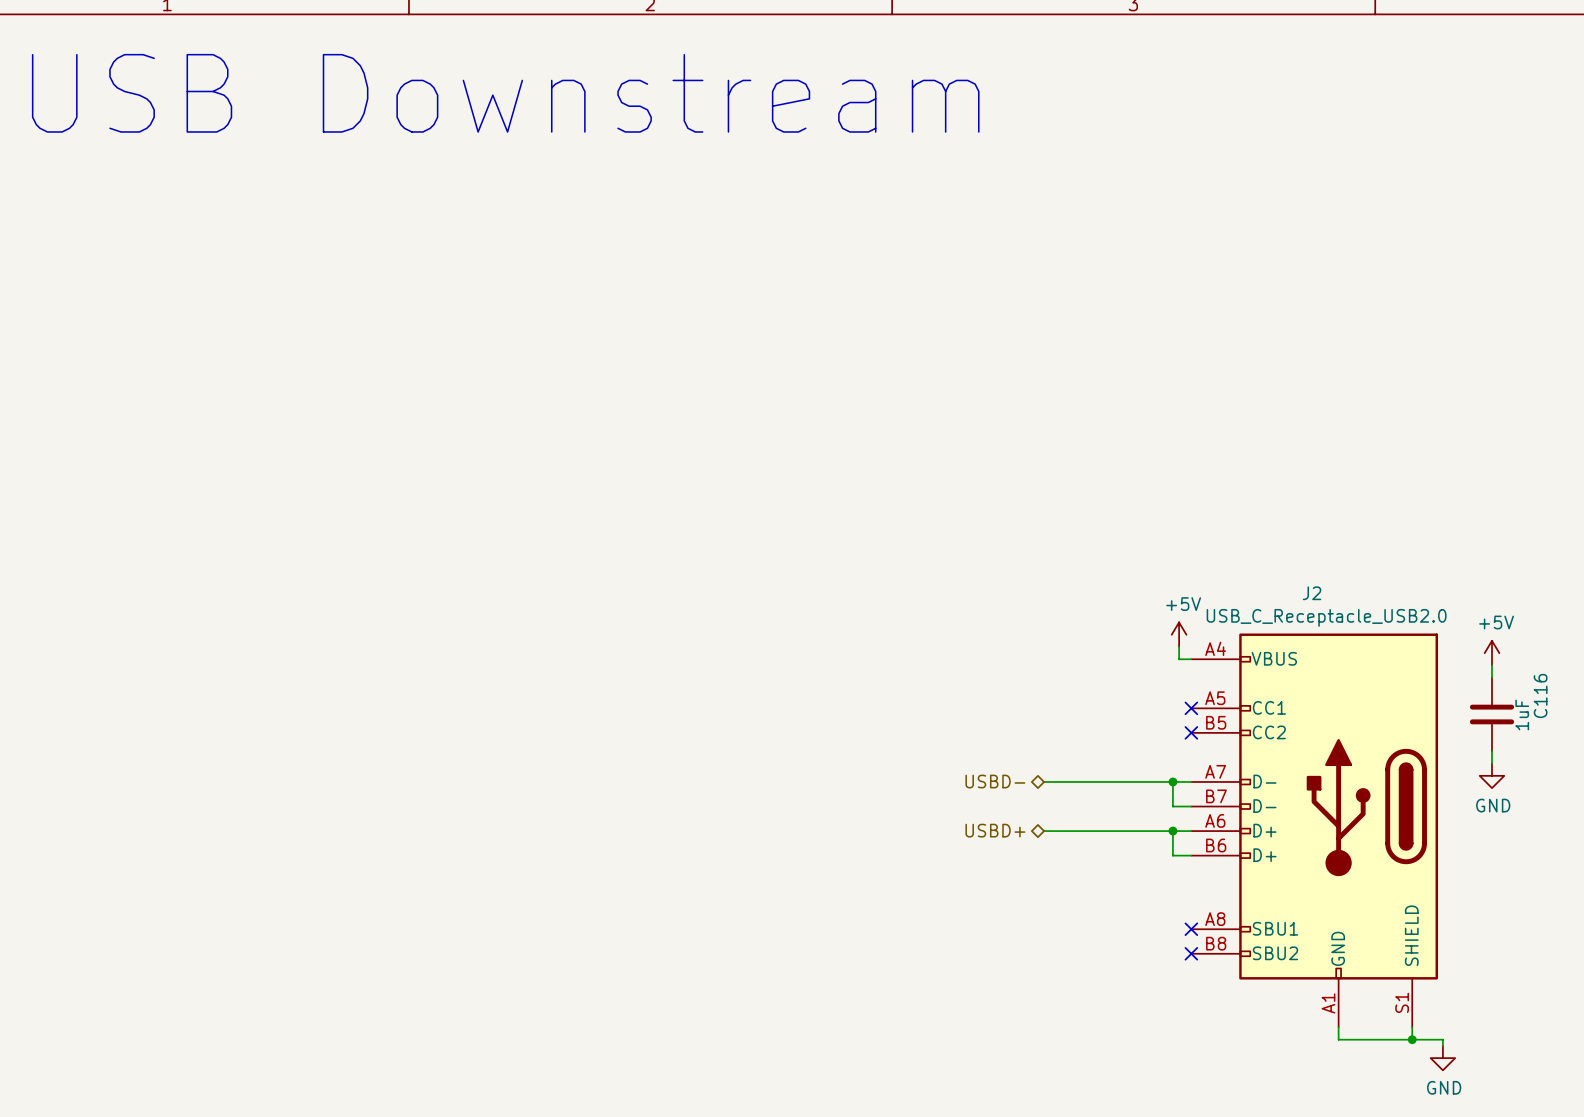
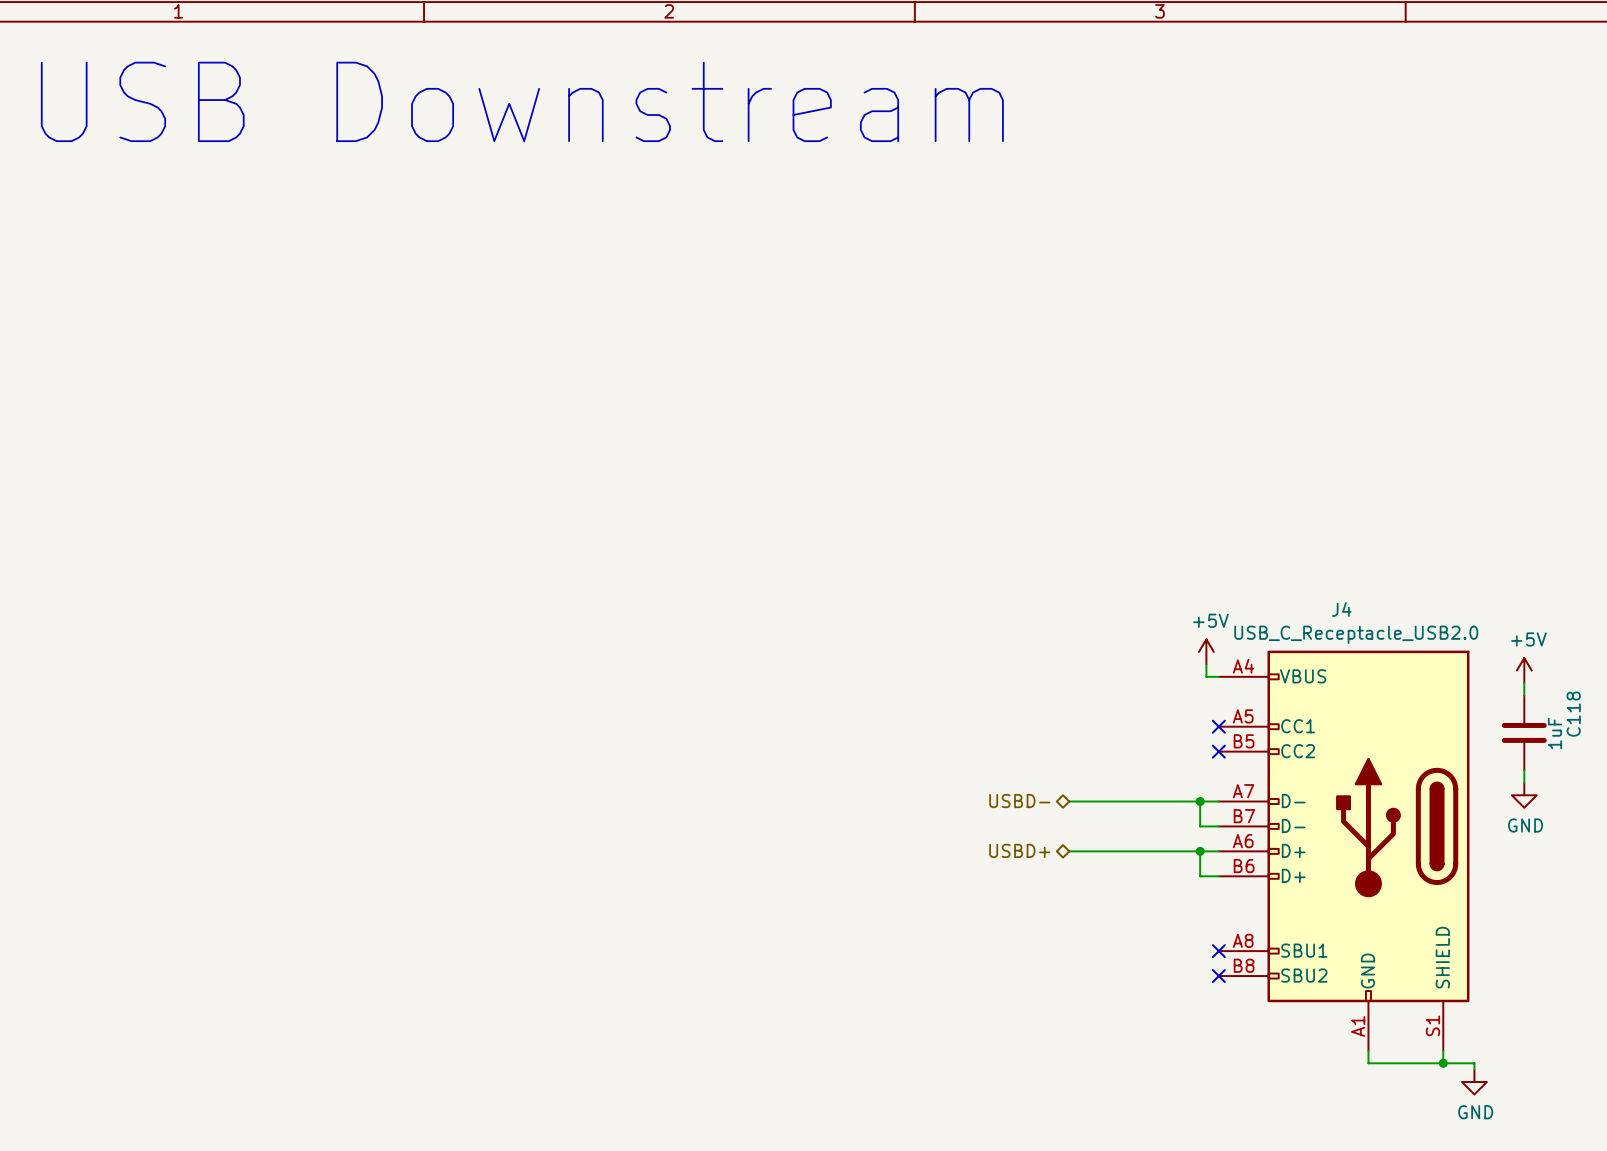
J2 name: J2 (1312, 593) -> J4 (1341, 609)
C116 name: C116 (1540, 695) -> C118 (1573, 714)

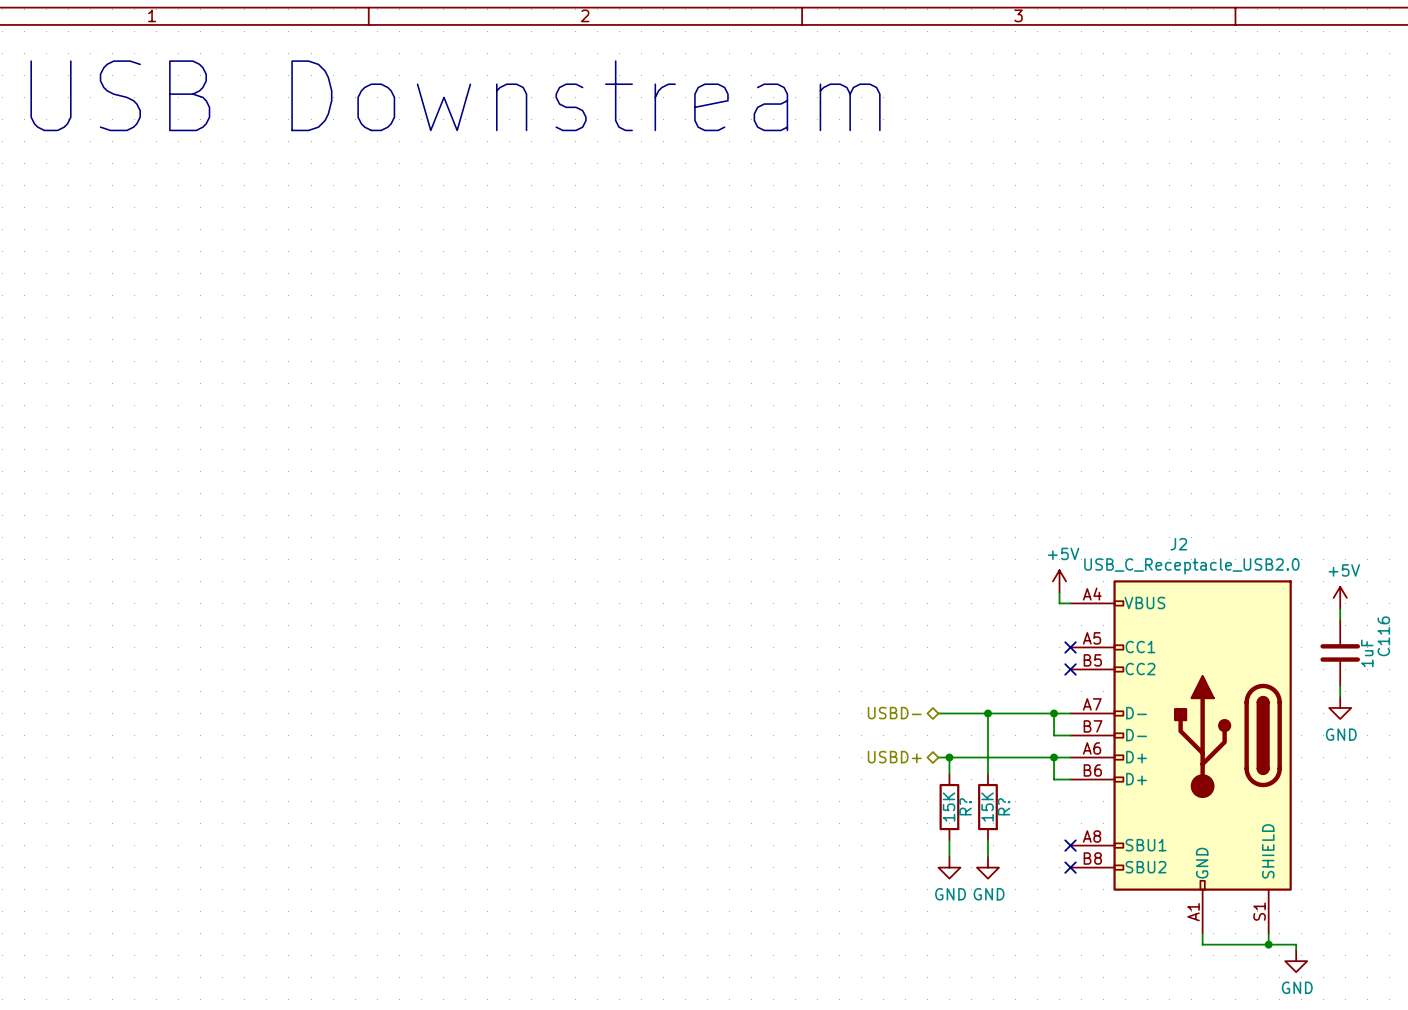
J4 name: J4 (1341, 609) -> J2 (1178, 544)
C118 name: C118 (1573, 714) -> C116 (1383, 636)
wire: none -> (987, 713) (987, 774)
junction: none -> (987, 713)
wire: none -> (949, 757) (949, 774)
junction: none -> (949, 757)
R?: none -> 15K (949, 807)
R?: none -> 15K (987, 807)
wire: none -> (949, 840) (949, 856)
wire: none -> (987, 840) (987, 856)
power symbol: none -> GND (949, 867)
power symbol: none -> GND (987, 867)

